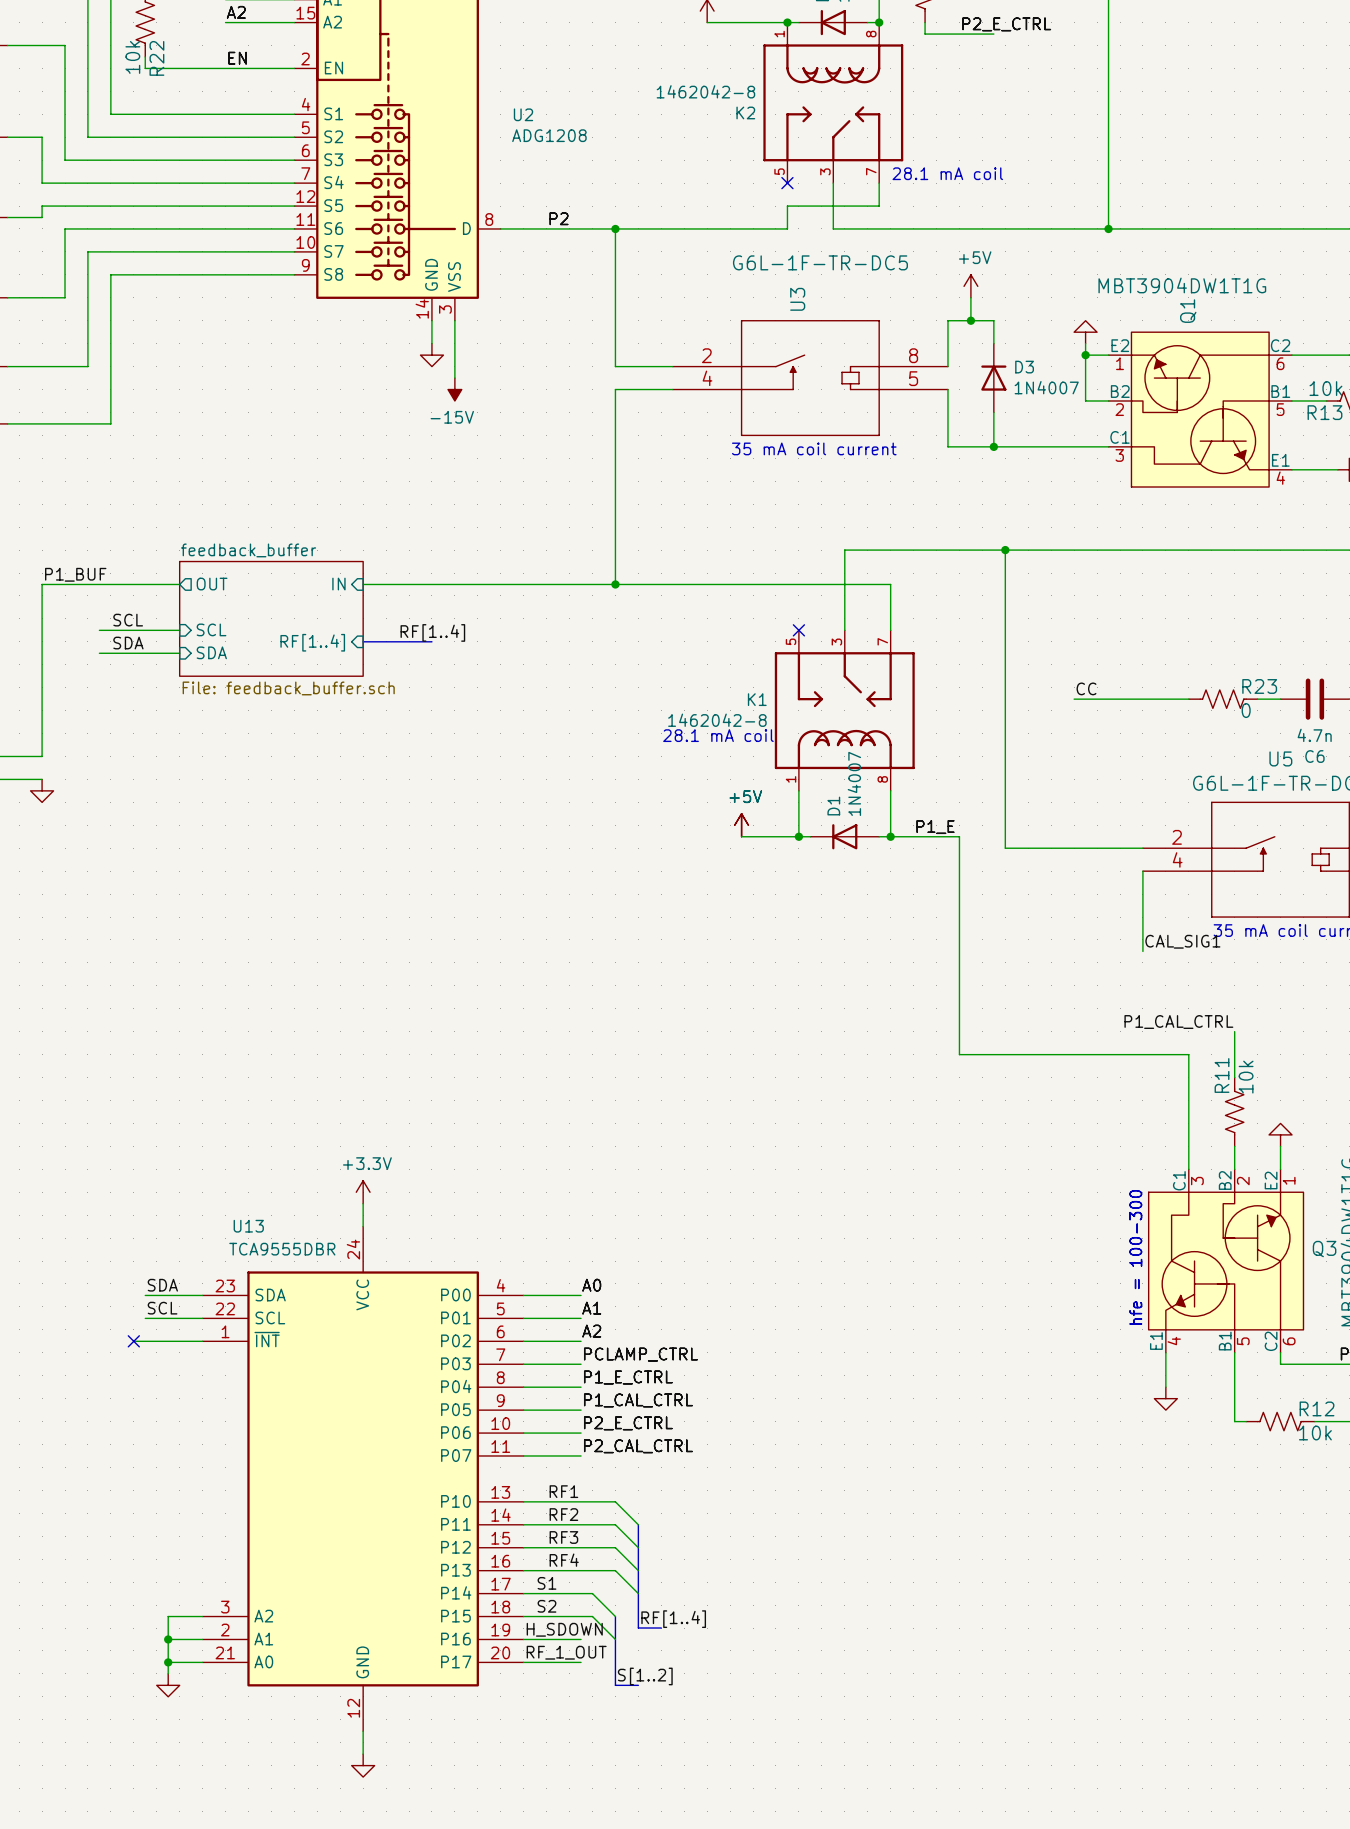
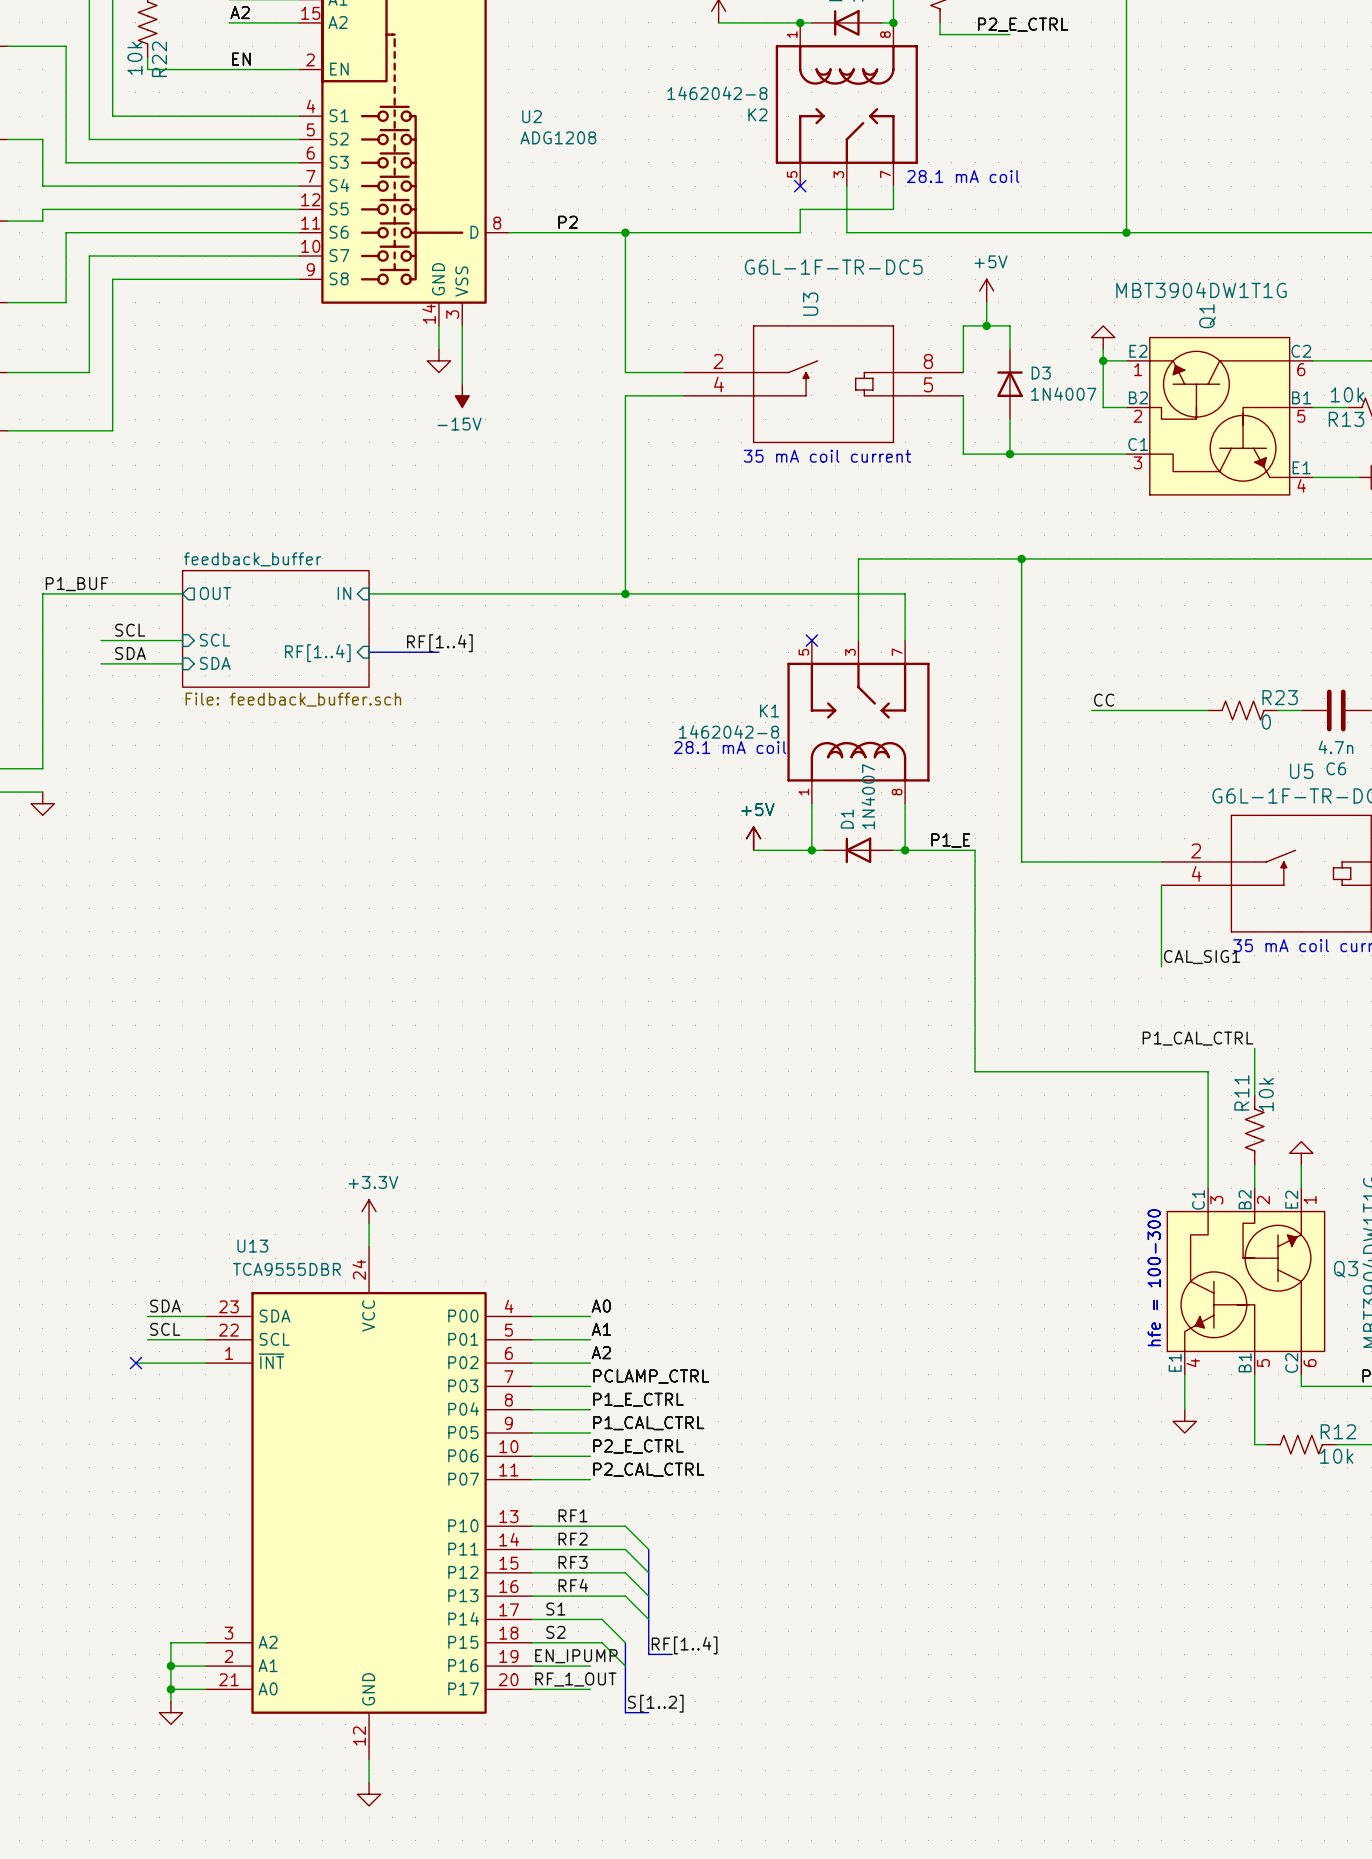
label: H_SDOWN (564, 1629) -> EN_IPUMP (576, 1656)

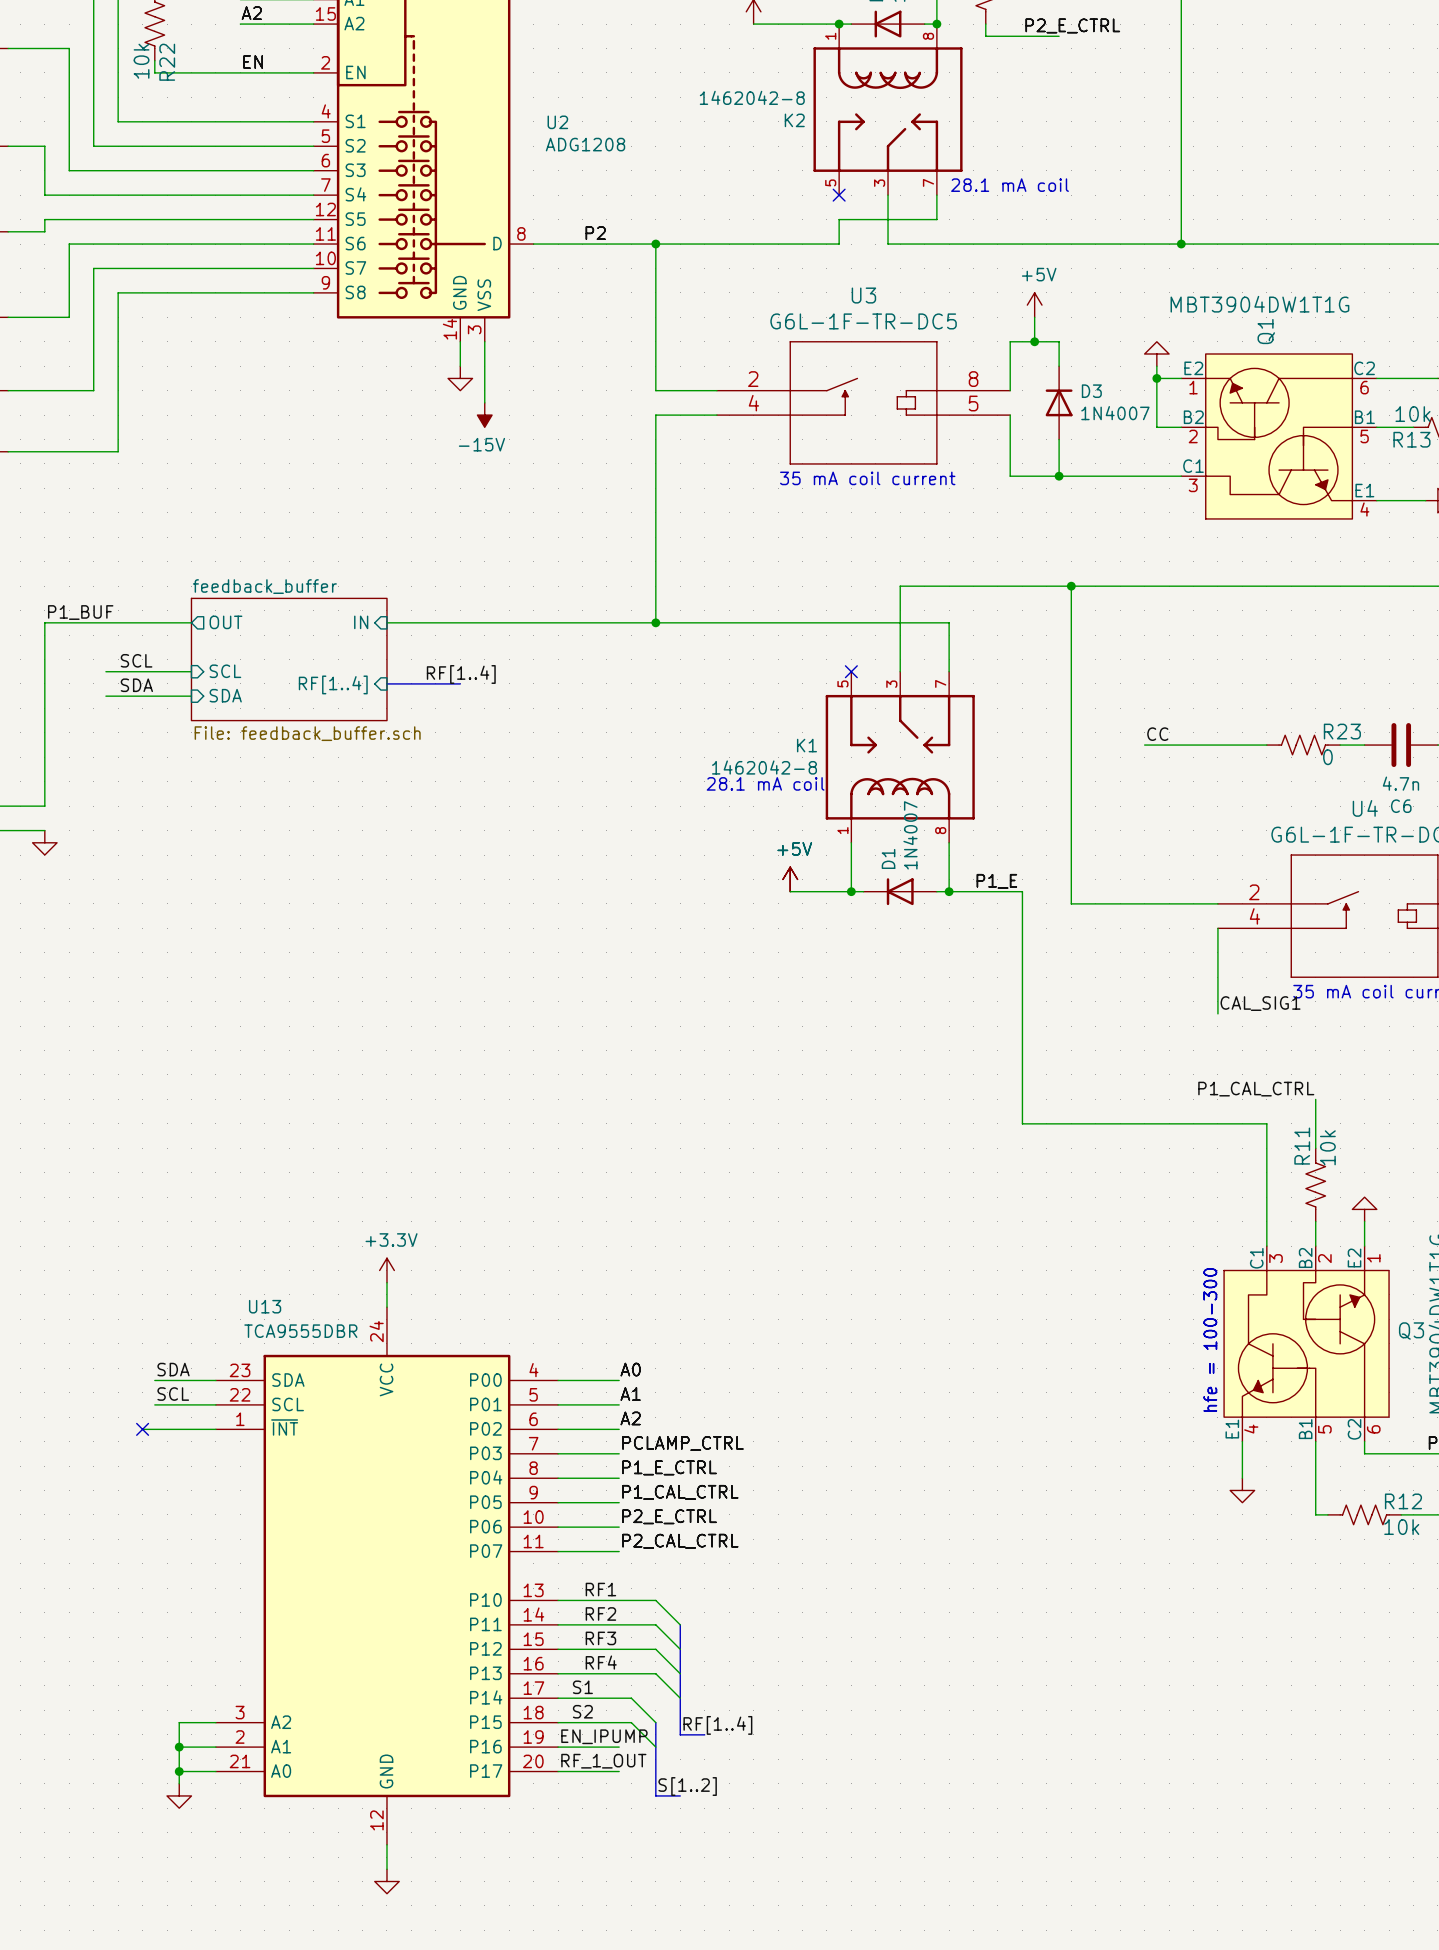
U3 value position: G6L-1F-TR-DC5 (833, 267) -> G6L-1F-TR-DC5 (863, 321)
U3 name rotation: 0° (810, 304) -> 90° clockwise (863, 295)
U5 name: U5 (1301, 771) -> U4 (1365, 808)

